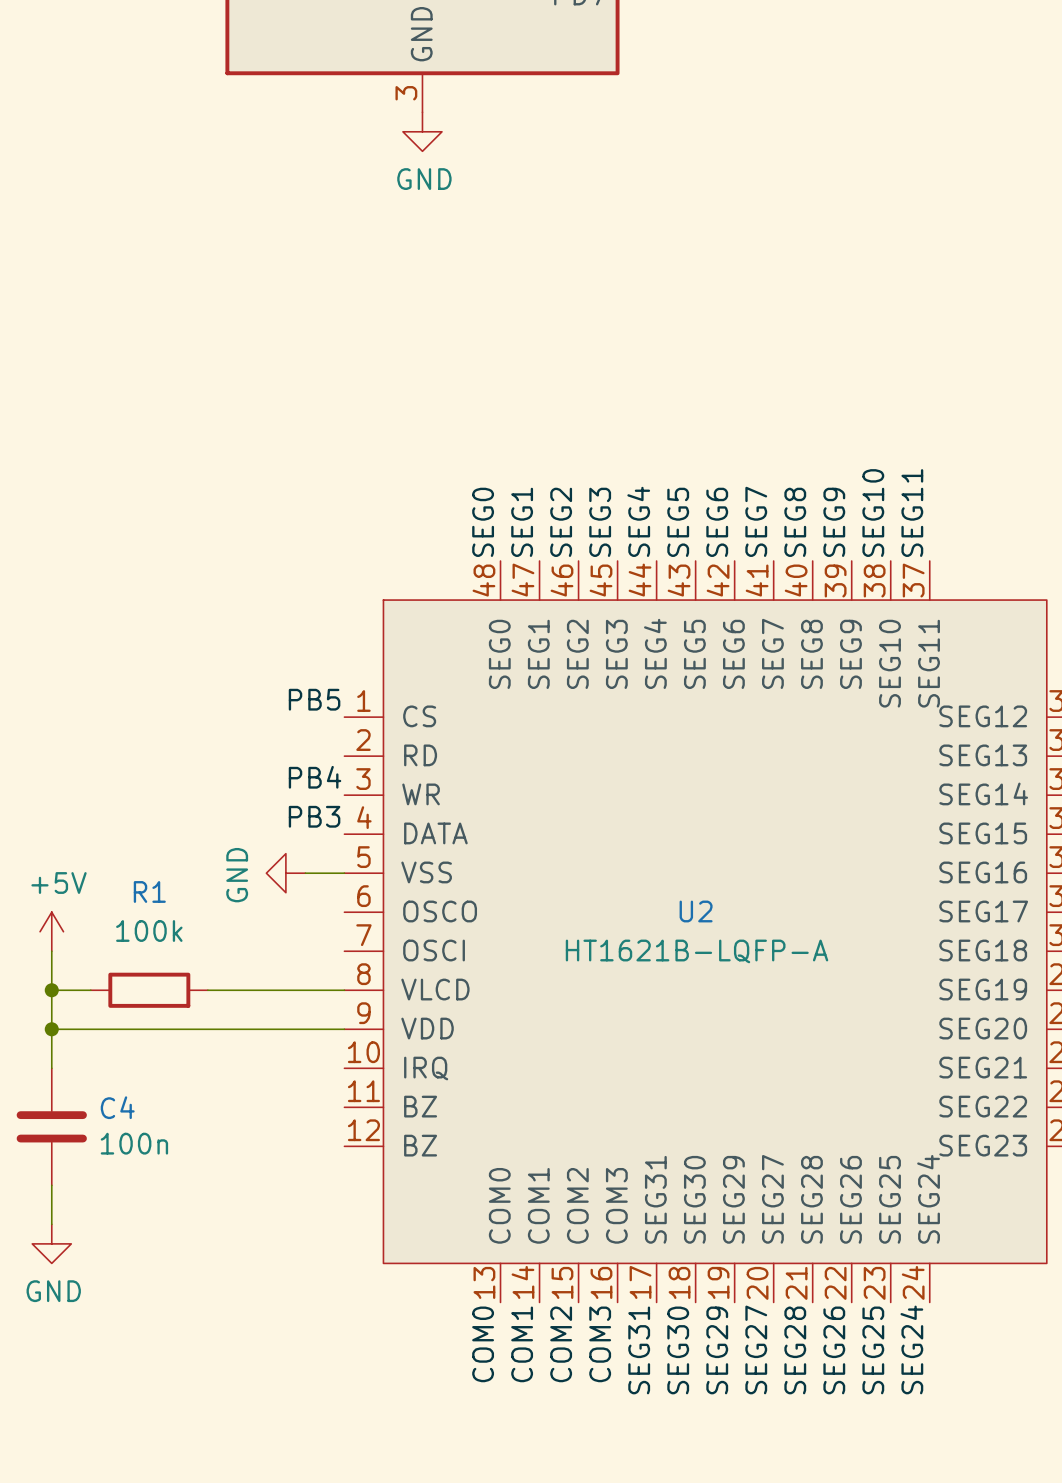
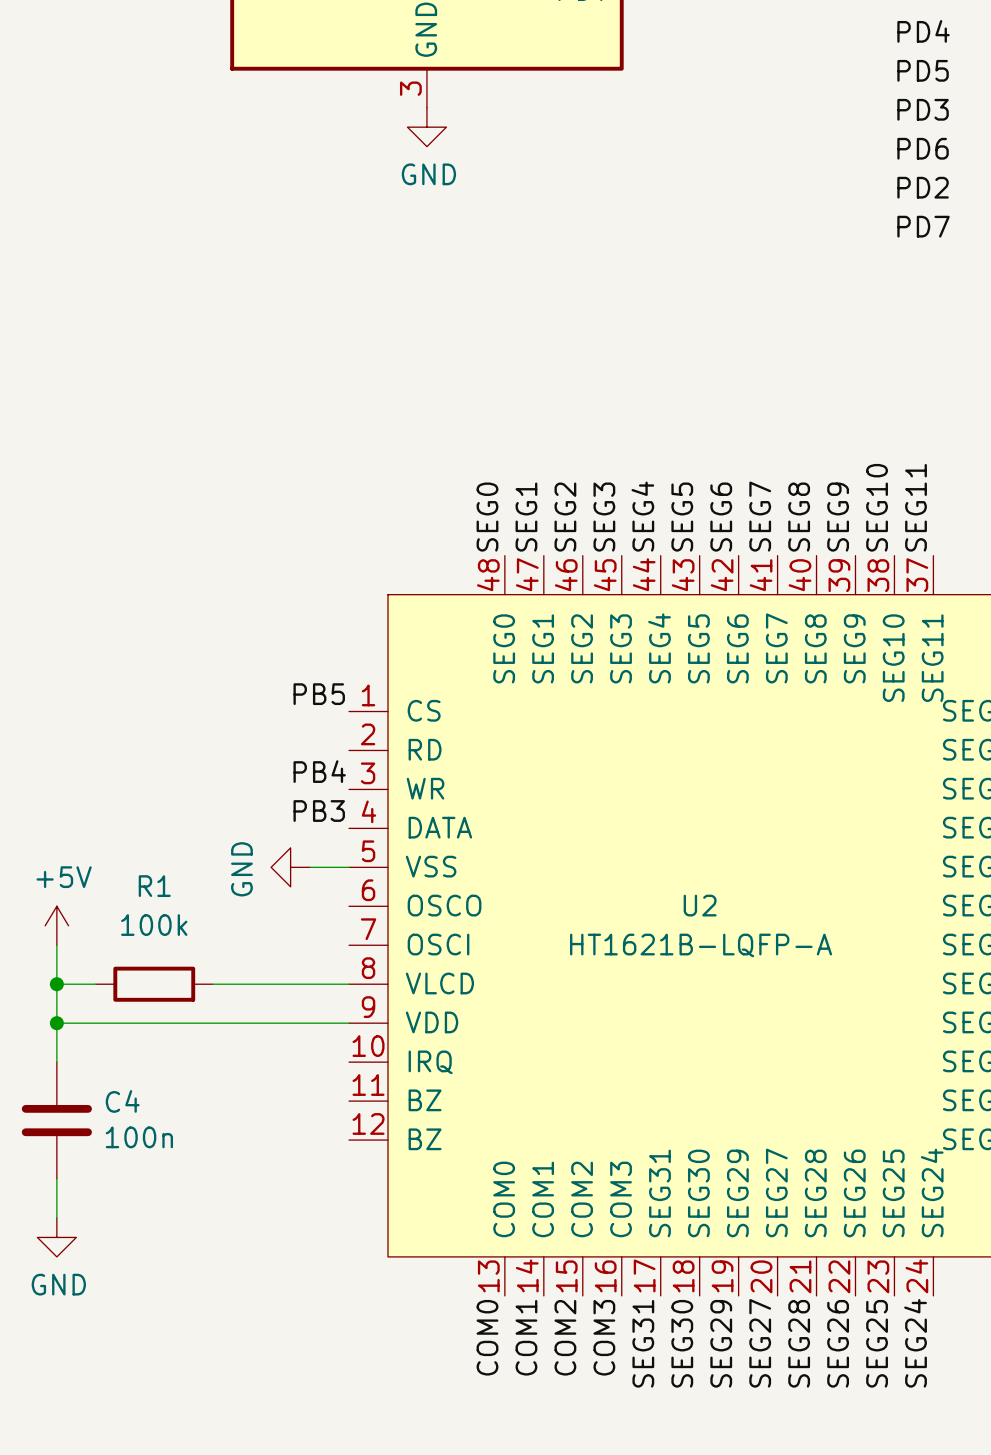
label: none -> PD4 (923, 31)
label: none -> PD5 (923, 70)
label: none -> PD3 (923, 109)
label: none -> PD6 (923, 148)
label: none -> PD2 (923, 187)
label: none -> PD7 (923, 226)

